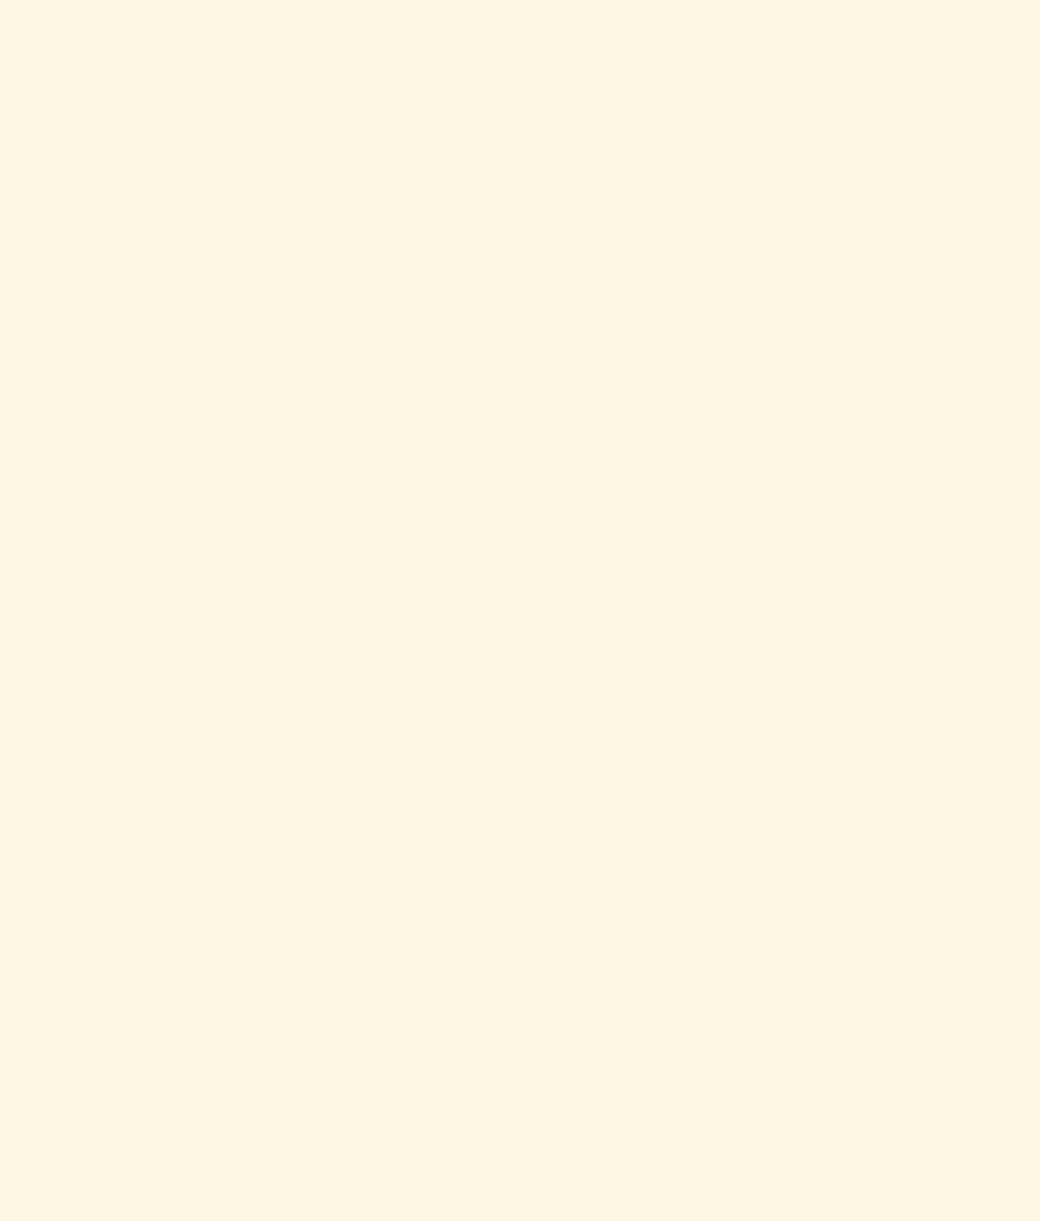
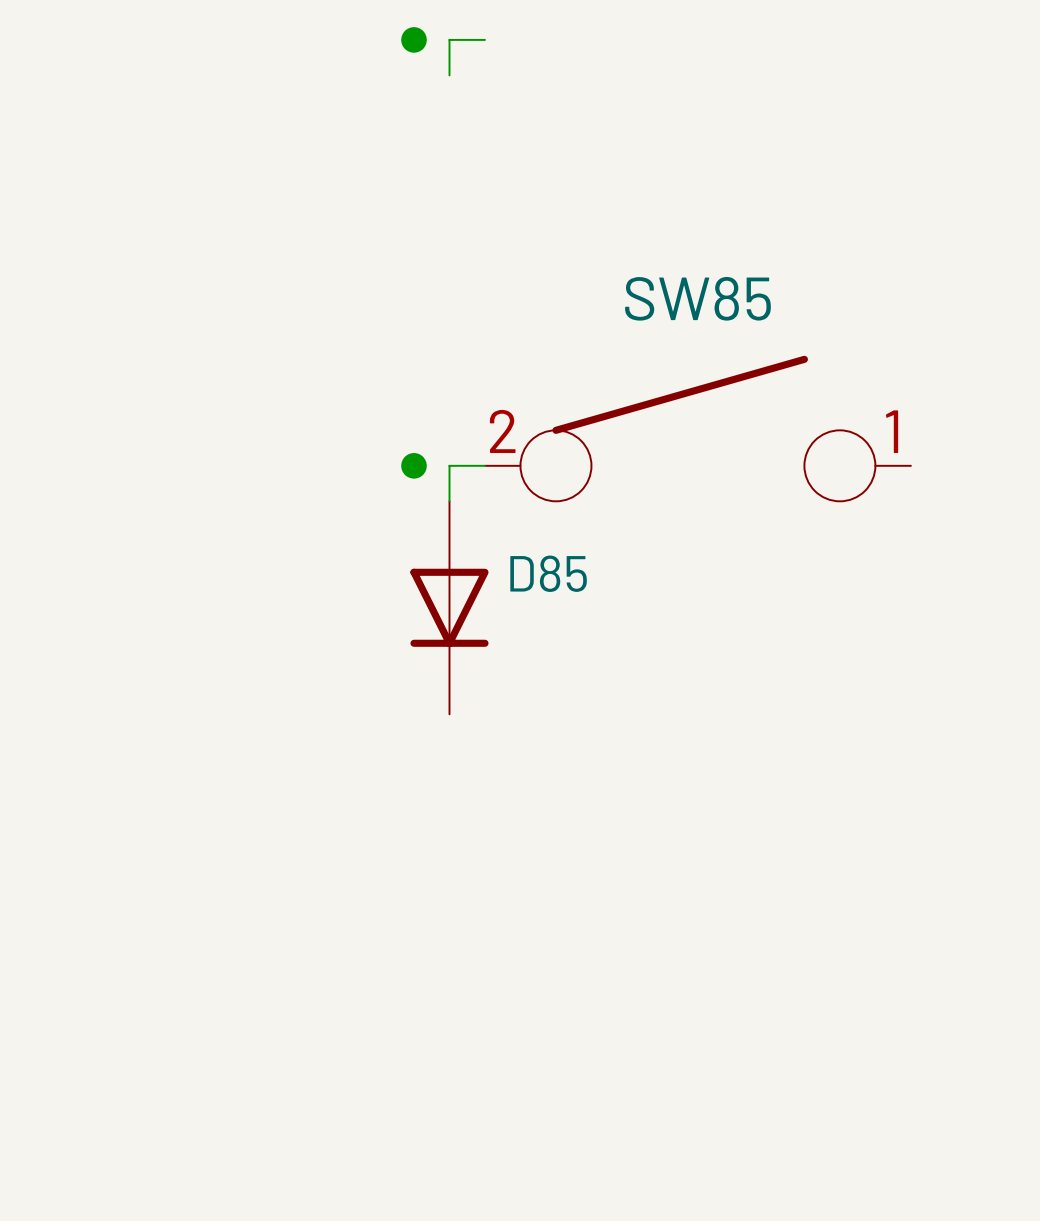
junction: none -> (414, 39)
wire: none -> (484, 39) (449, 39) (449, 75)
SW85: none -> (697, 428)
junction: none -> (414, 465)
wire: none -> (484, 465) (449, 465) (449, 501)
D85: none -> (449, 607)

